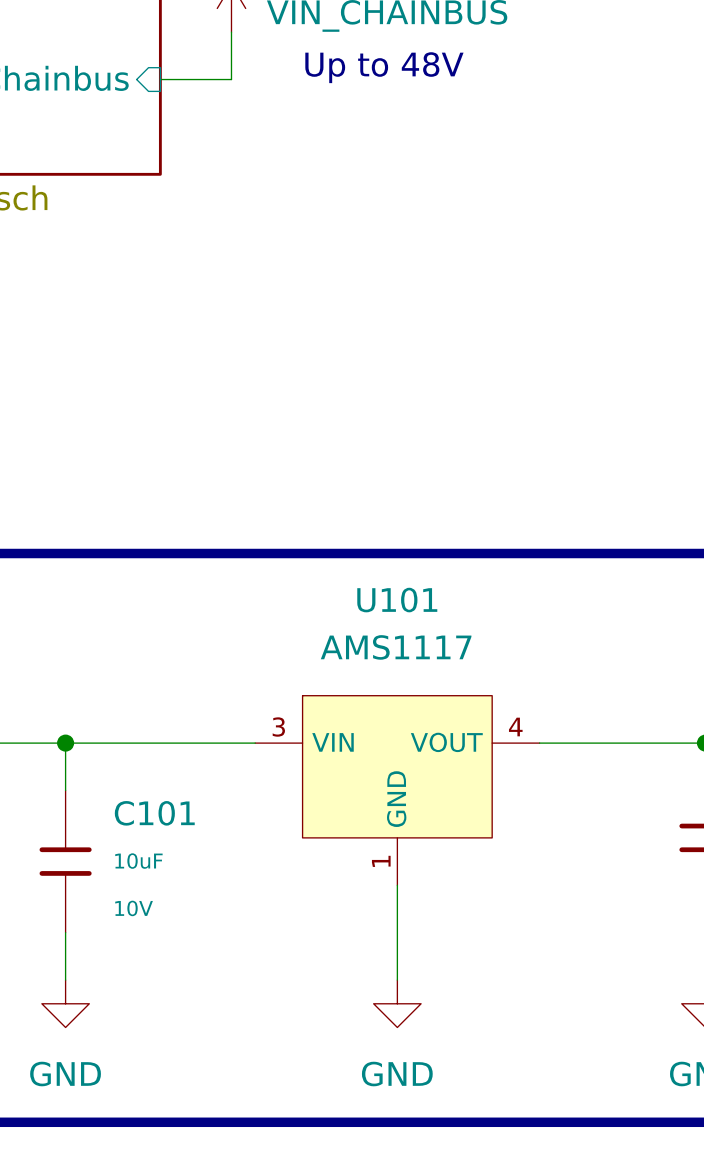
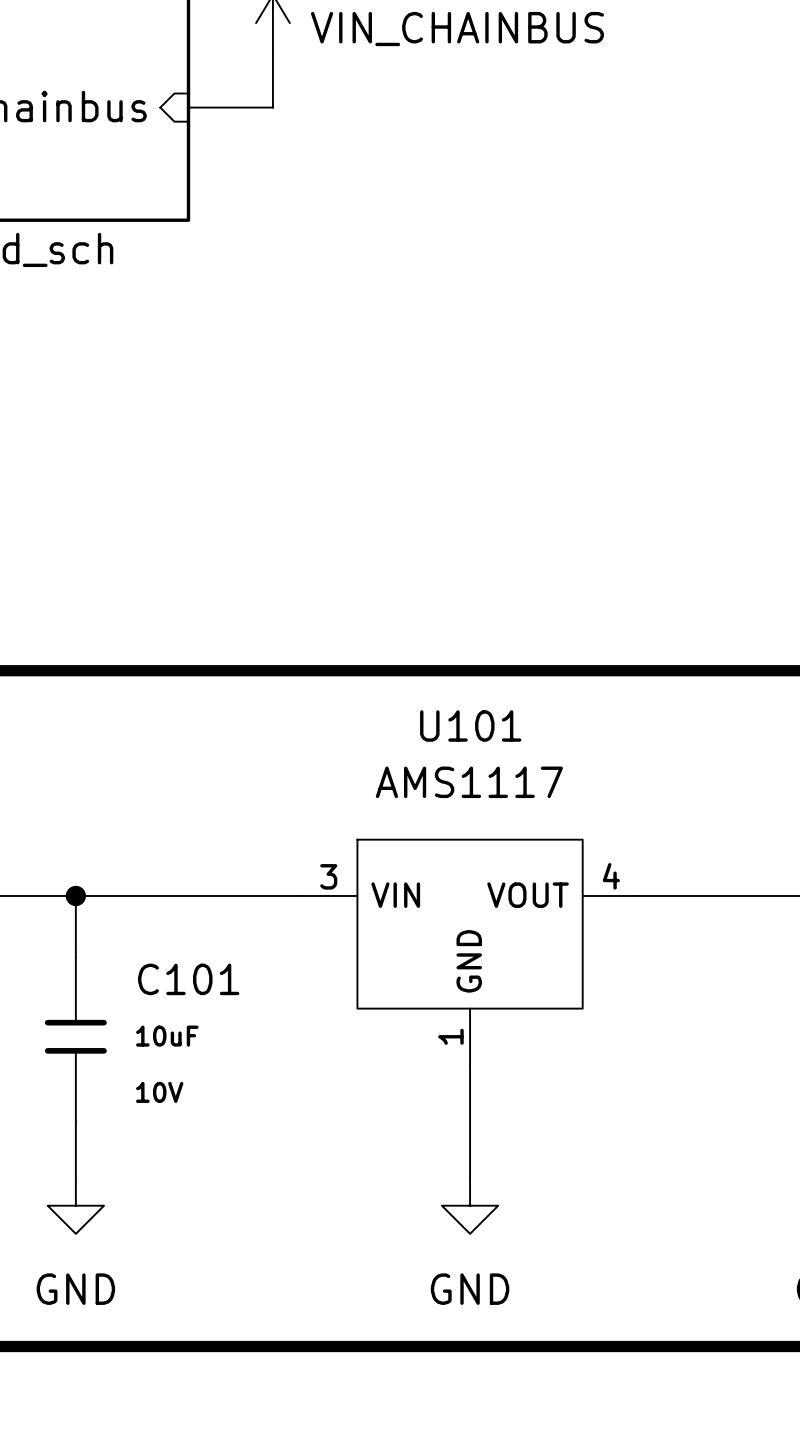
text: Up to 48V (384, 67) -> none

